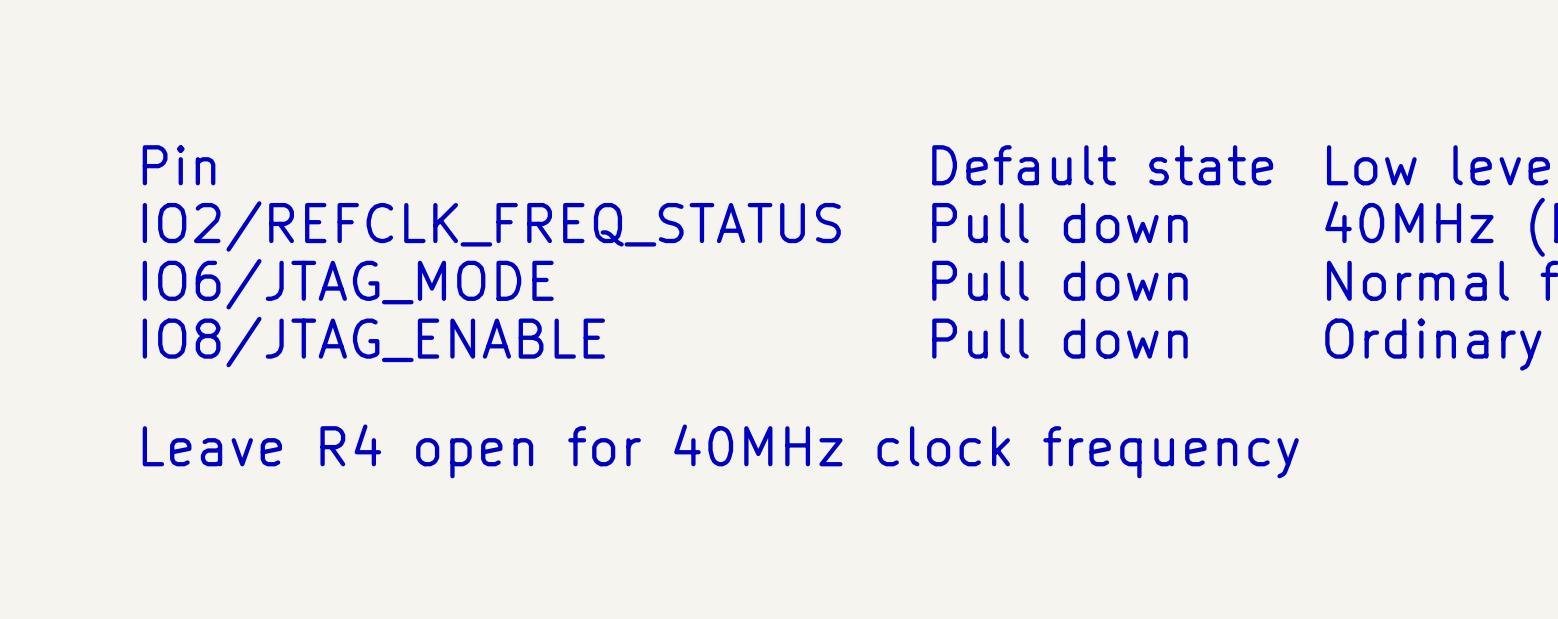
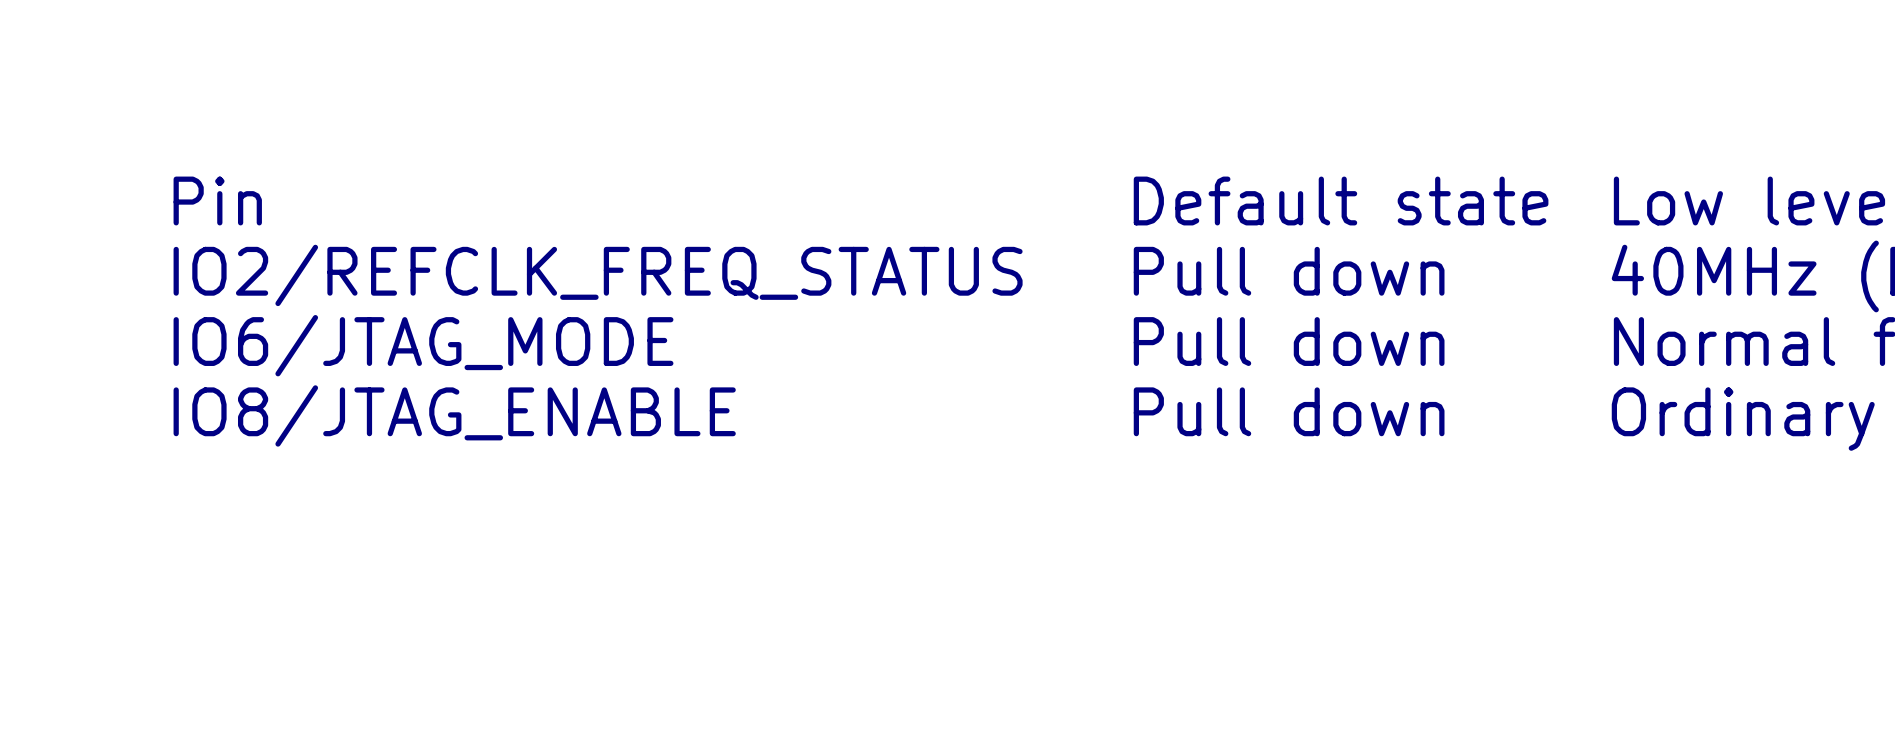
text: Leave R4 open for 40MHz clock frequency (720, 451) -> none

